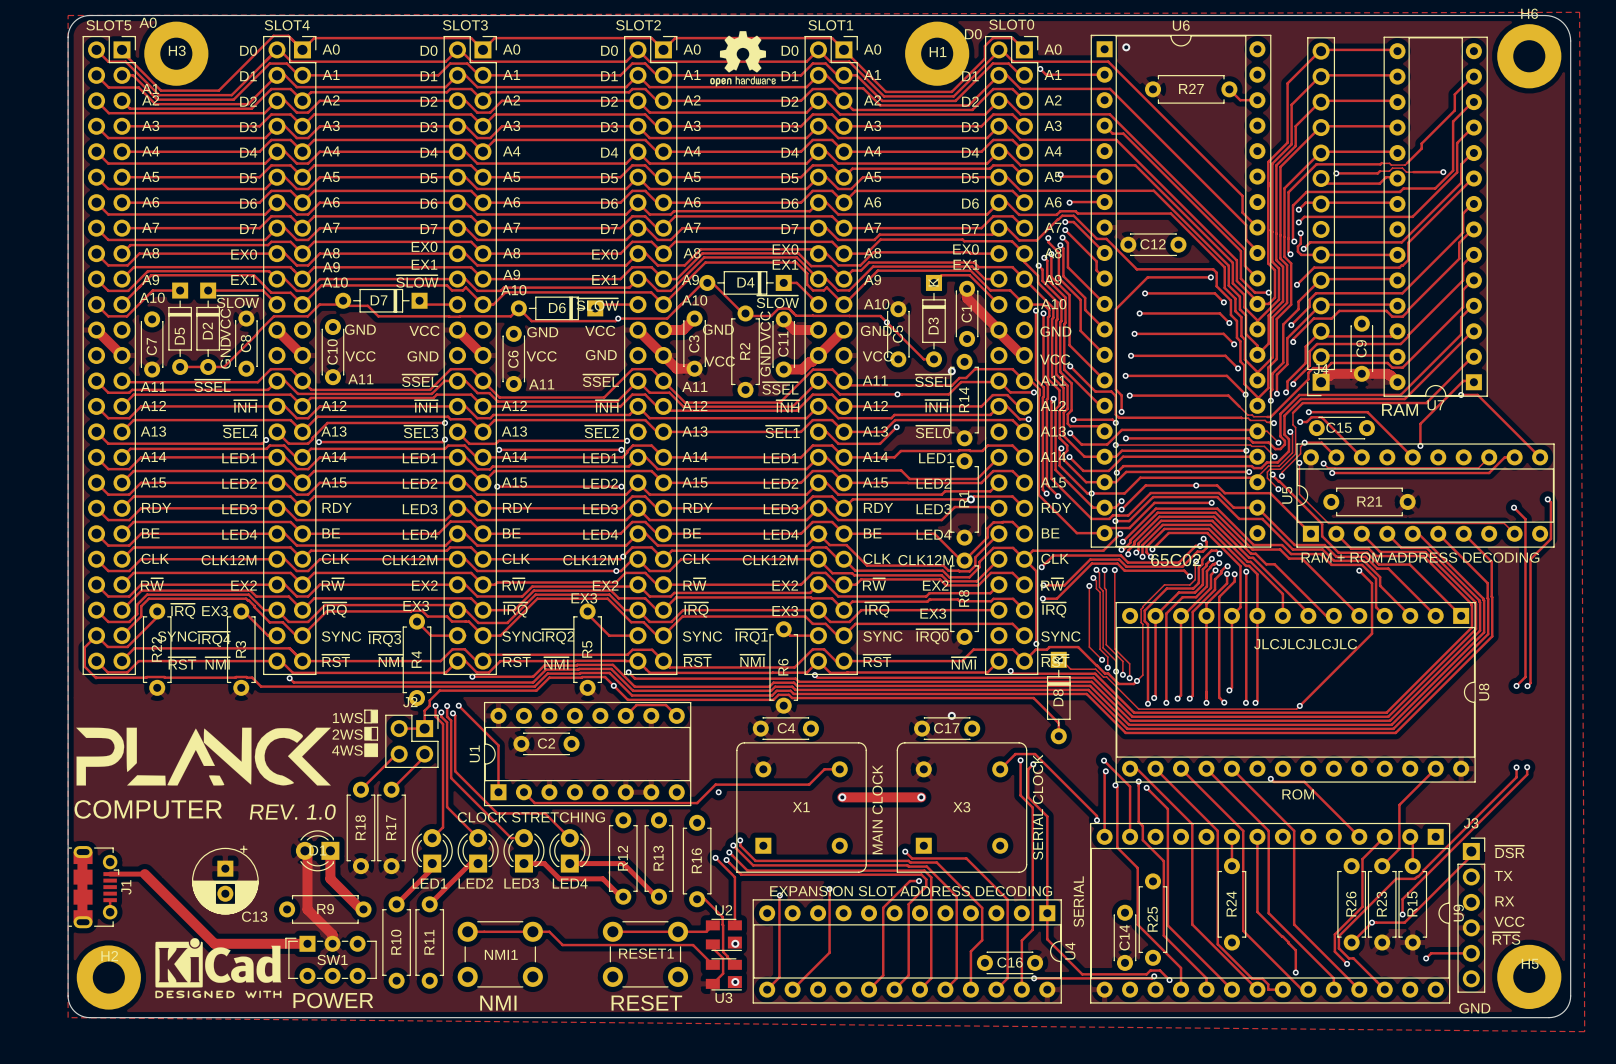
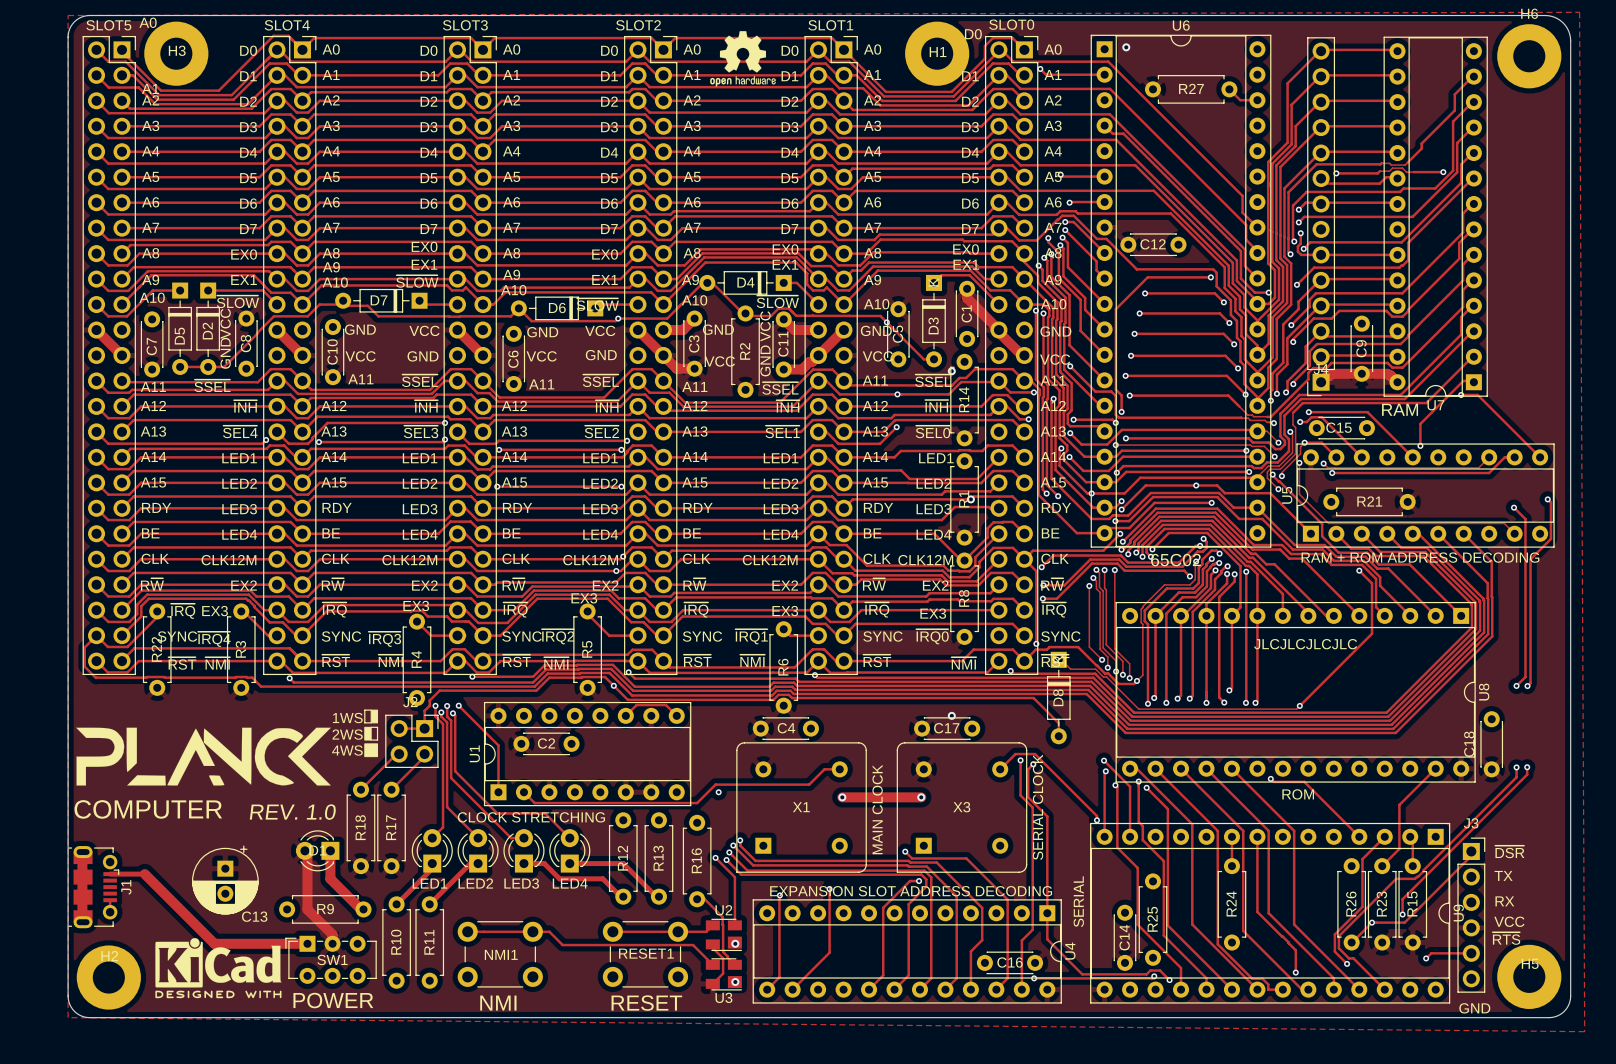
C18: none -> (1491, 744)

